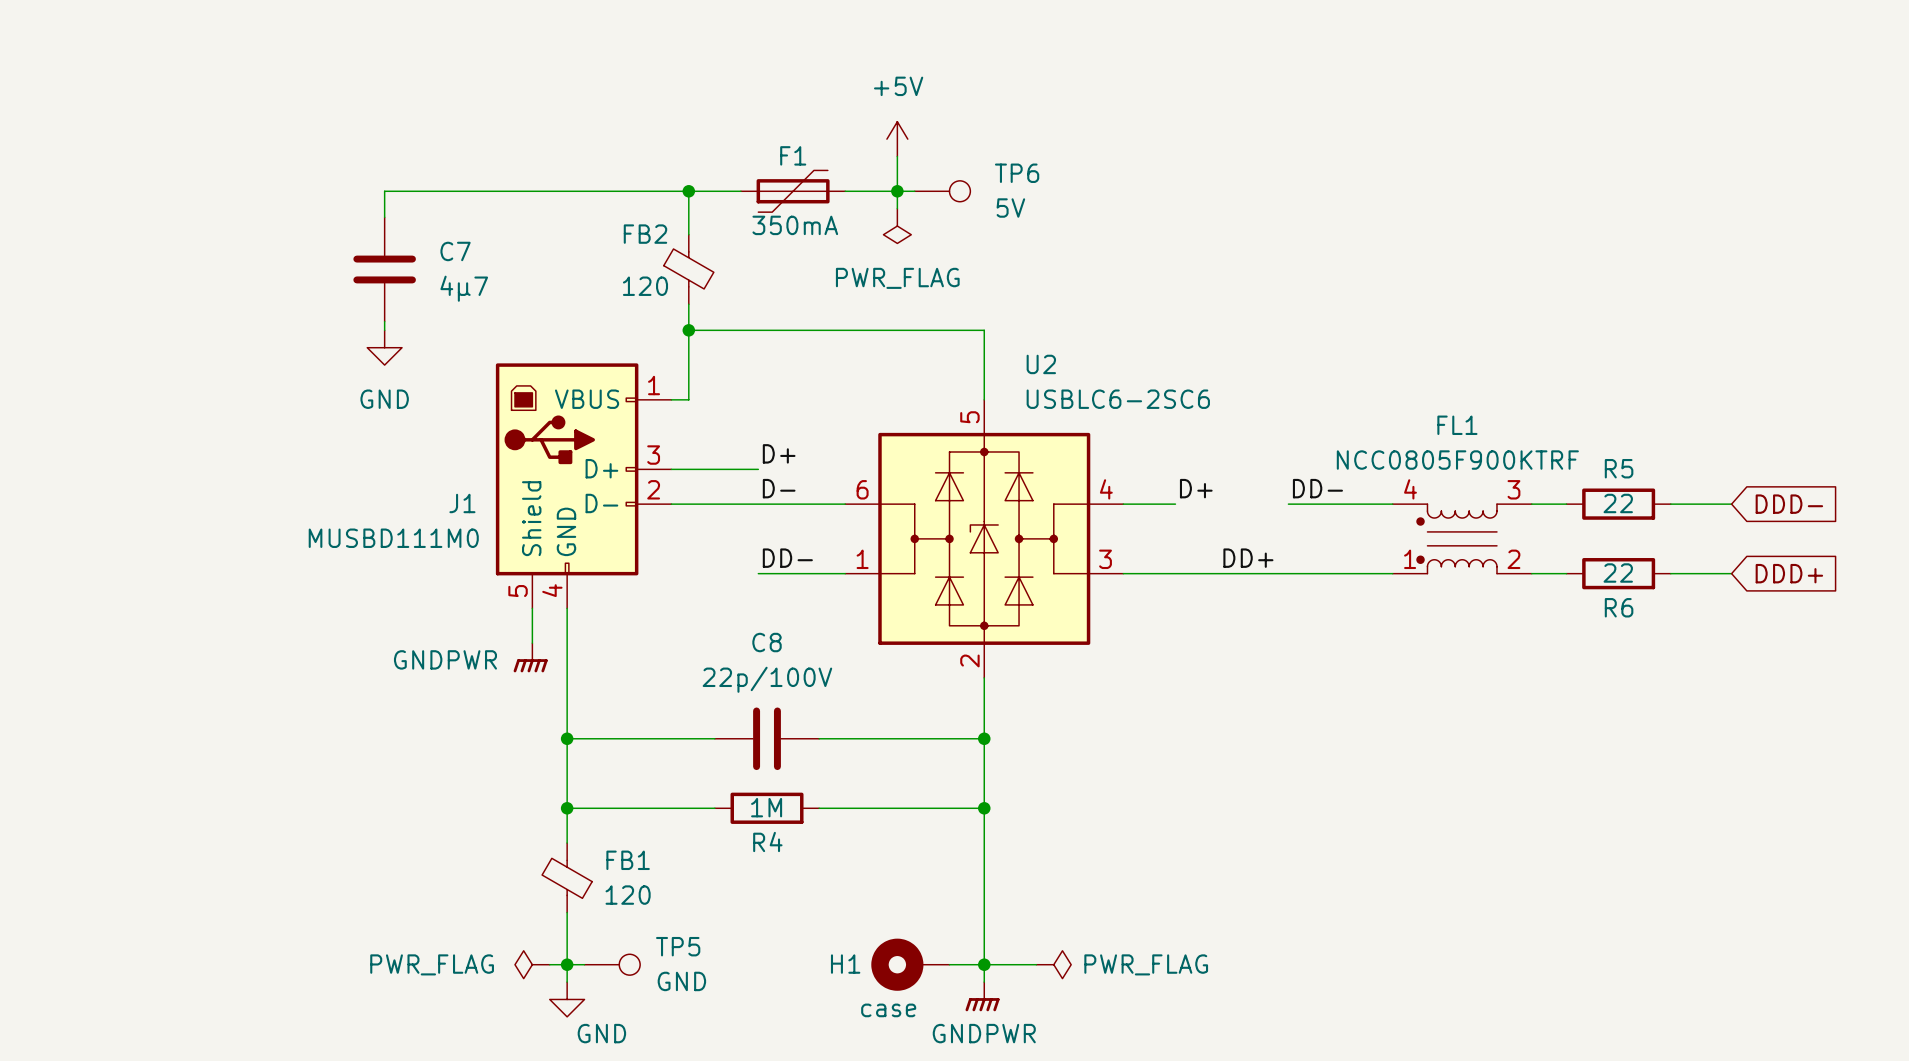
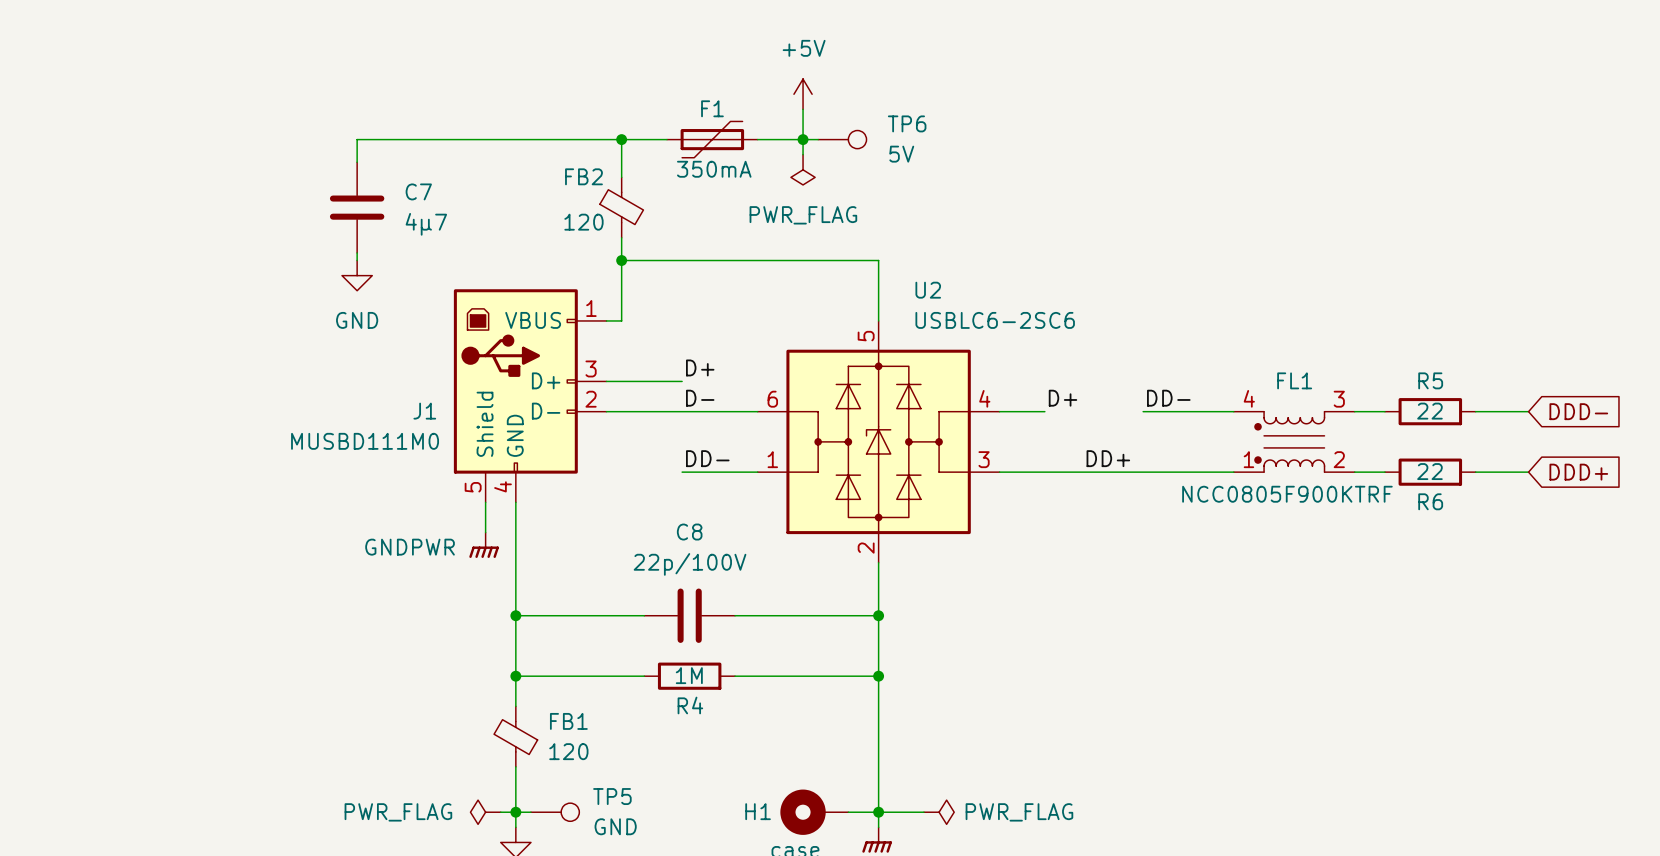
FL1 name position: FL1 (1457, 425) -> FL1 (1294, 380)
FL1 value position: NCC0805F900KTRF (1457, 460) -> NCC0805F900KTRF (1287, 494)

